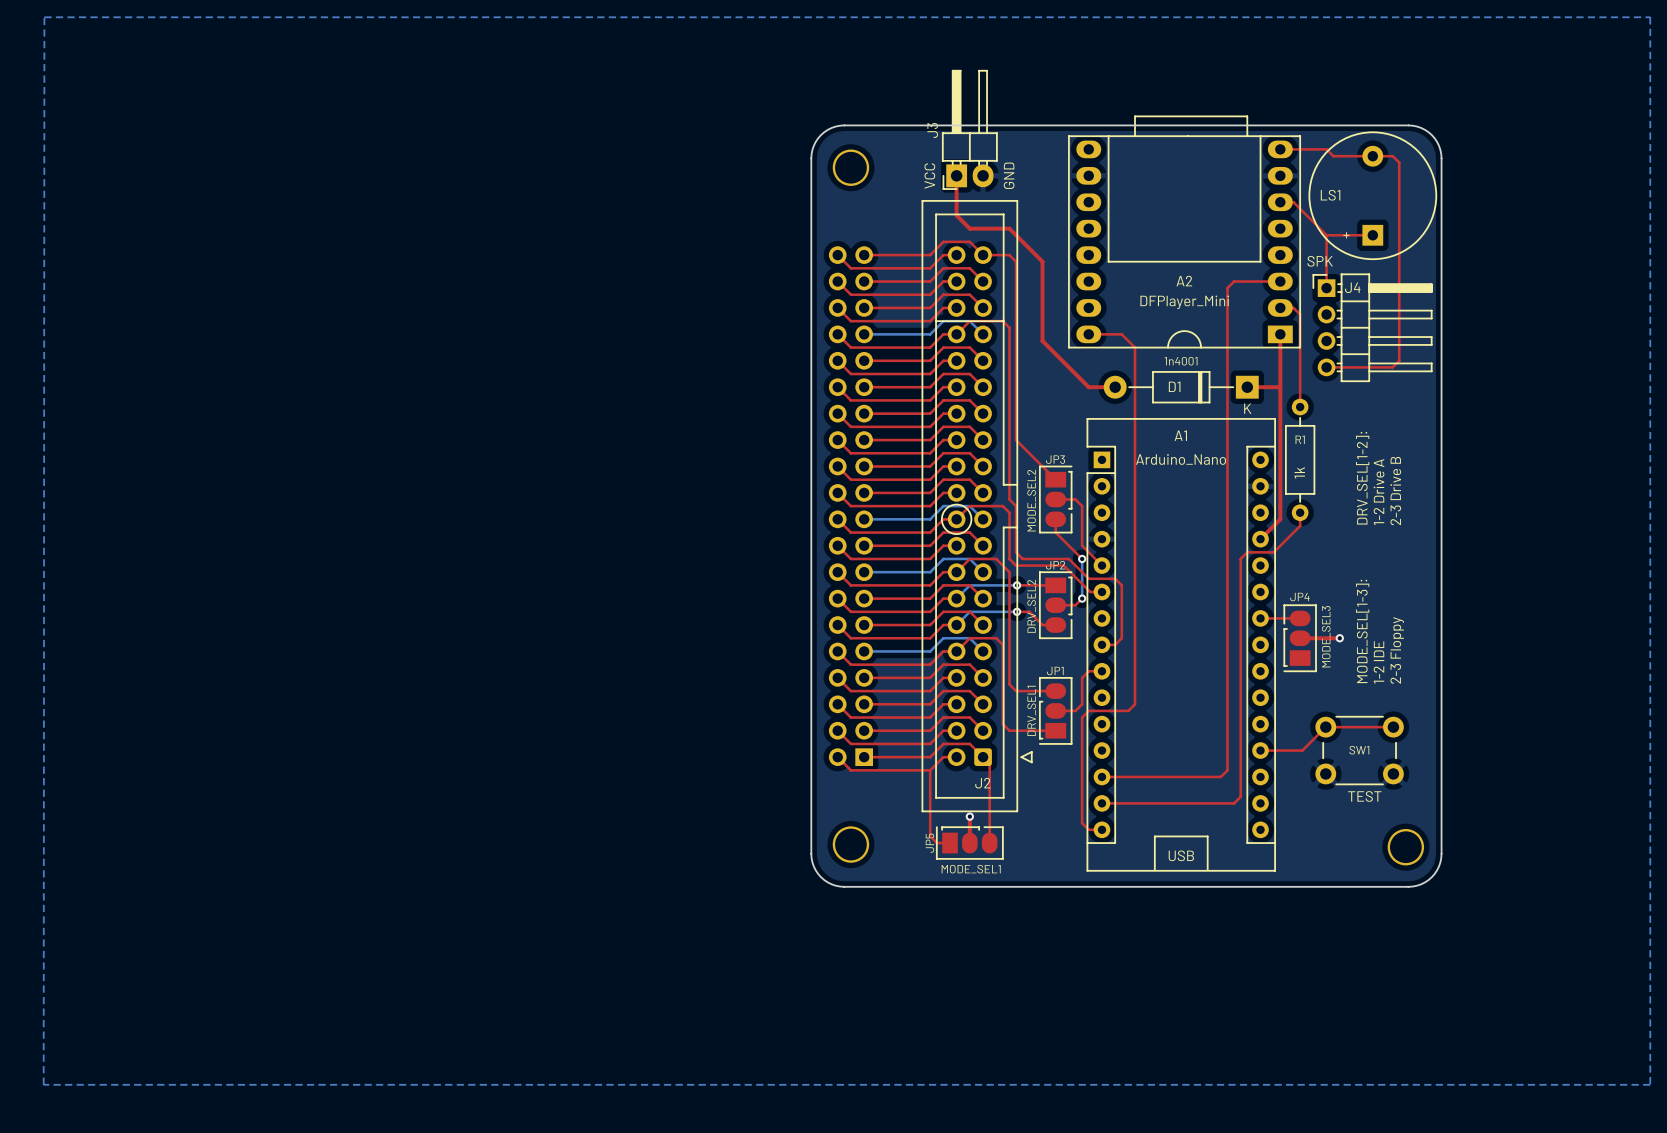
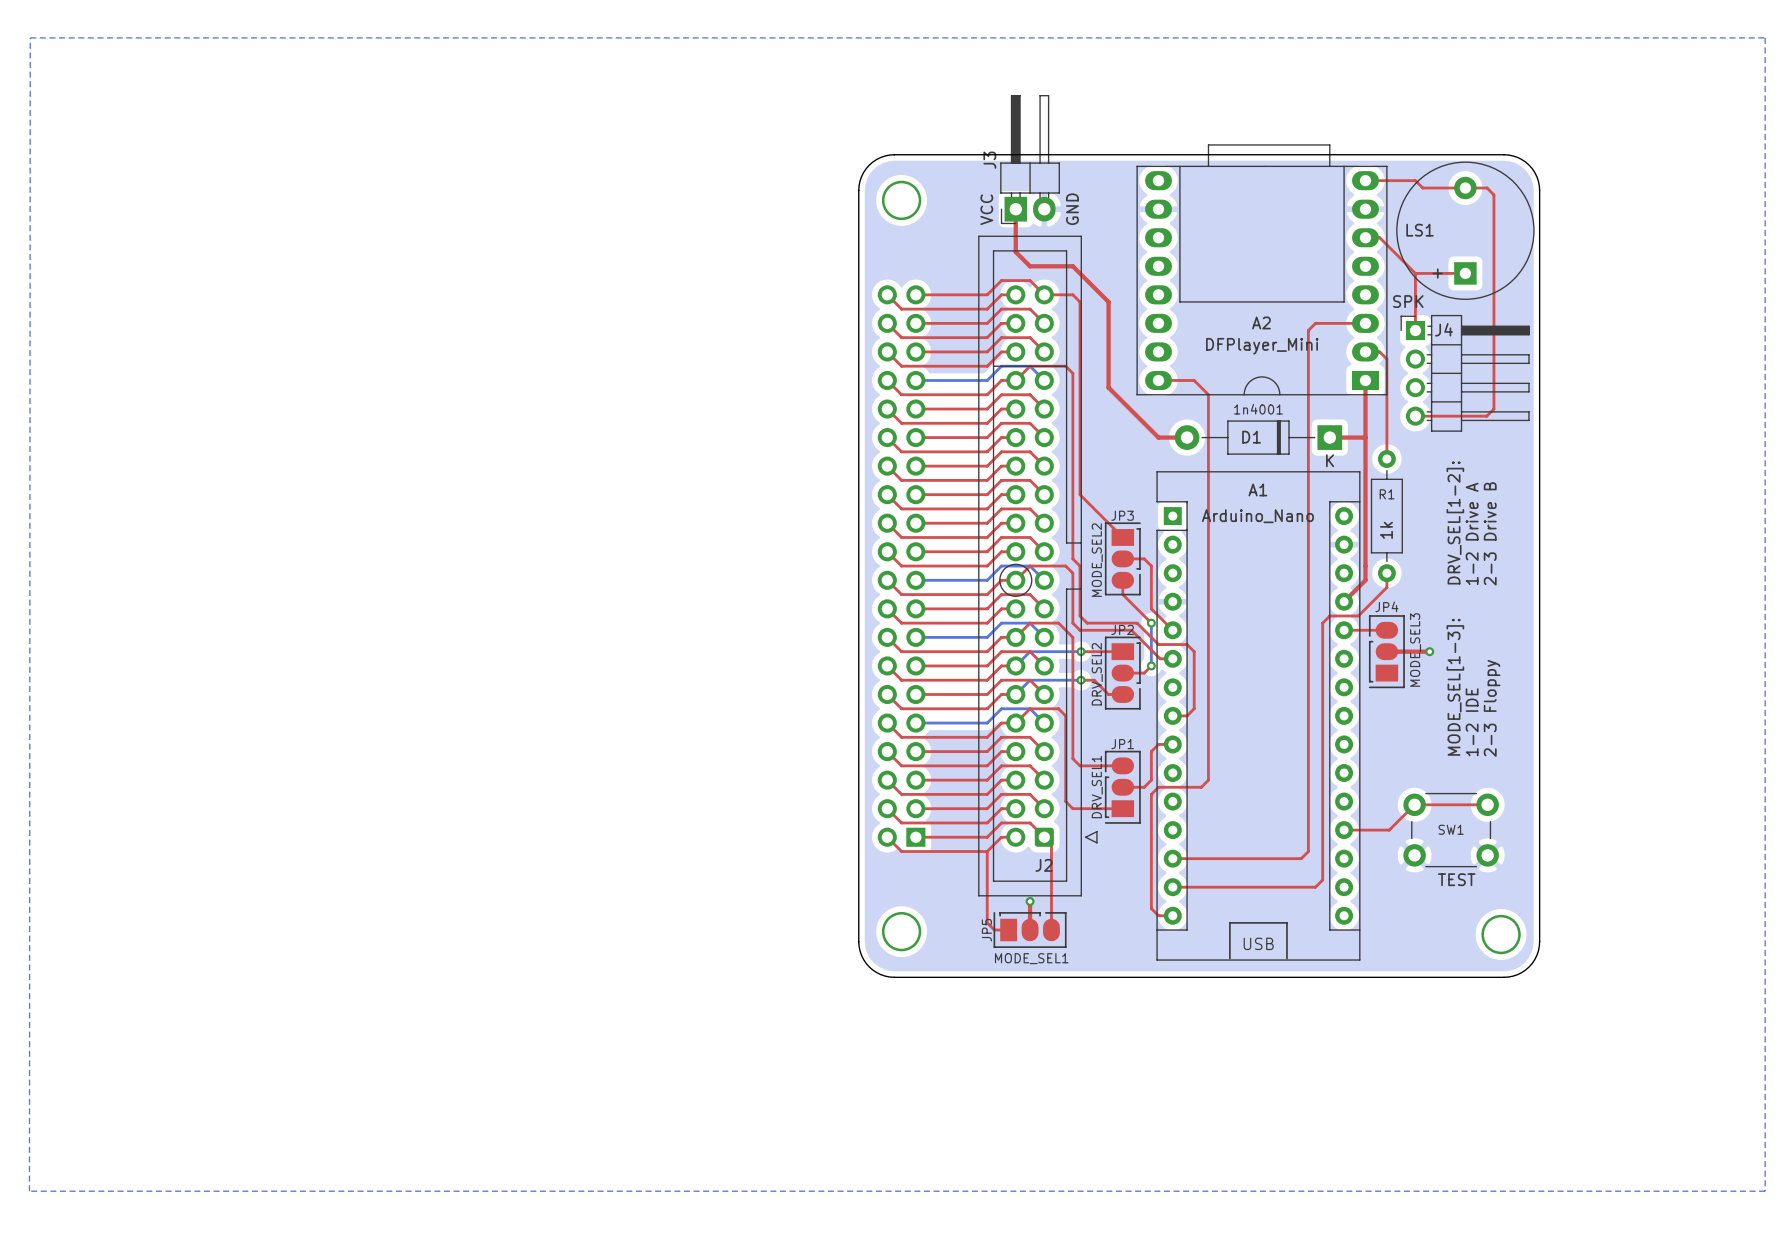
top track: (1260, 618) (1300, 618) -> (1386, 651) (1429, 651)
top track: (1300, 638) (1339, 638) -> (1344, 630) (1386, 630)
JP4 position: (1300, 638) -> (1386, 651)
via position: (1339, 638) -> (1429, 651)

